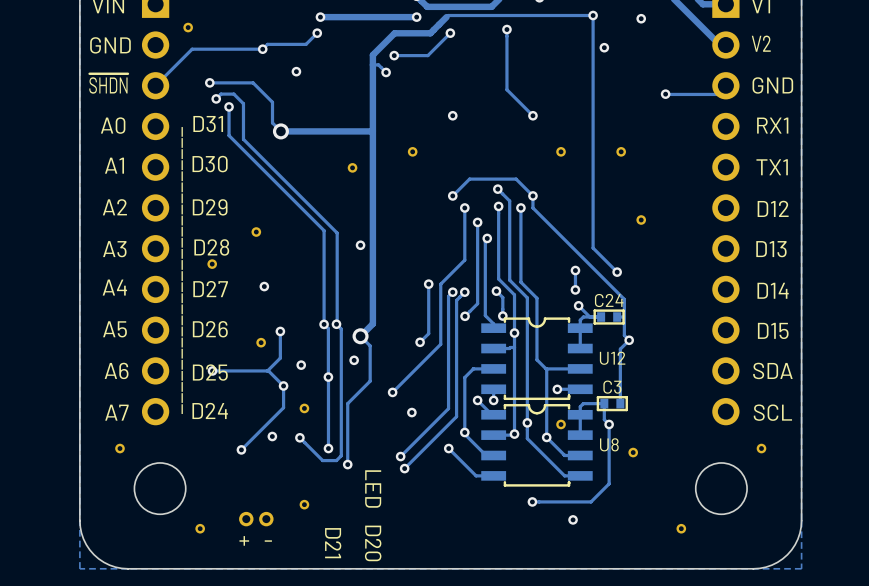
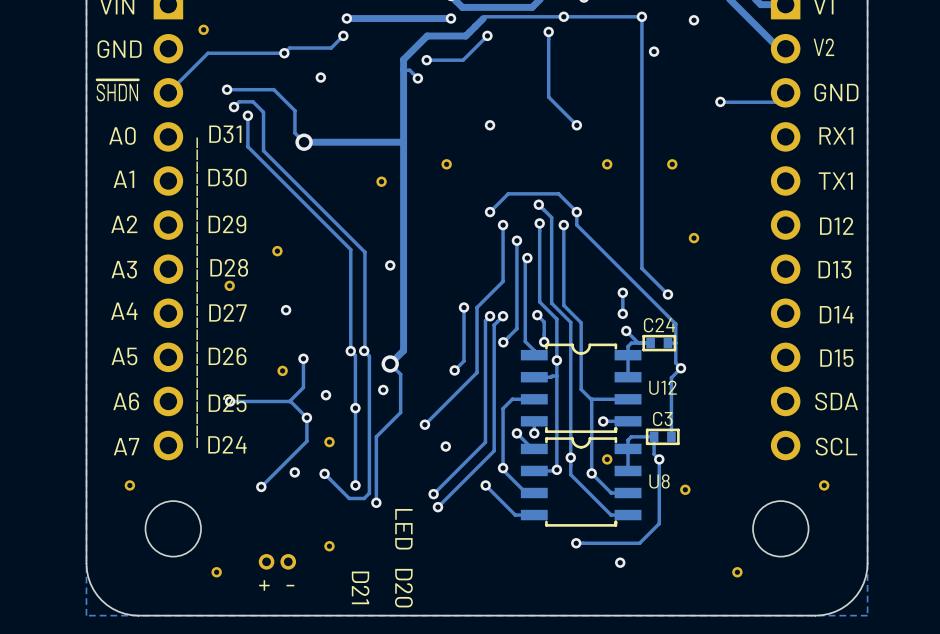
via: none -> (563, 16)

